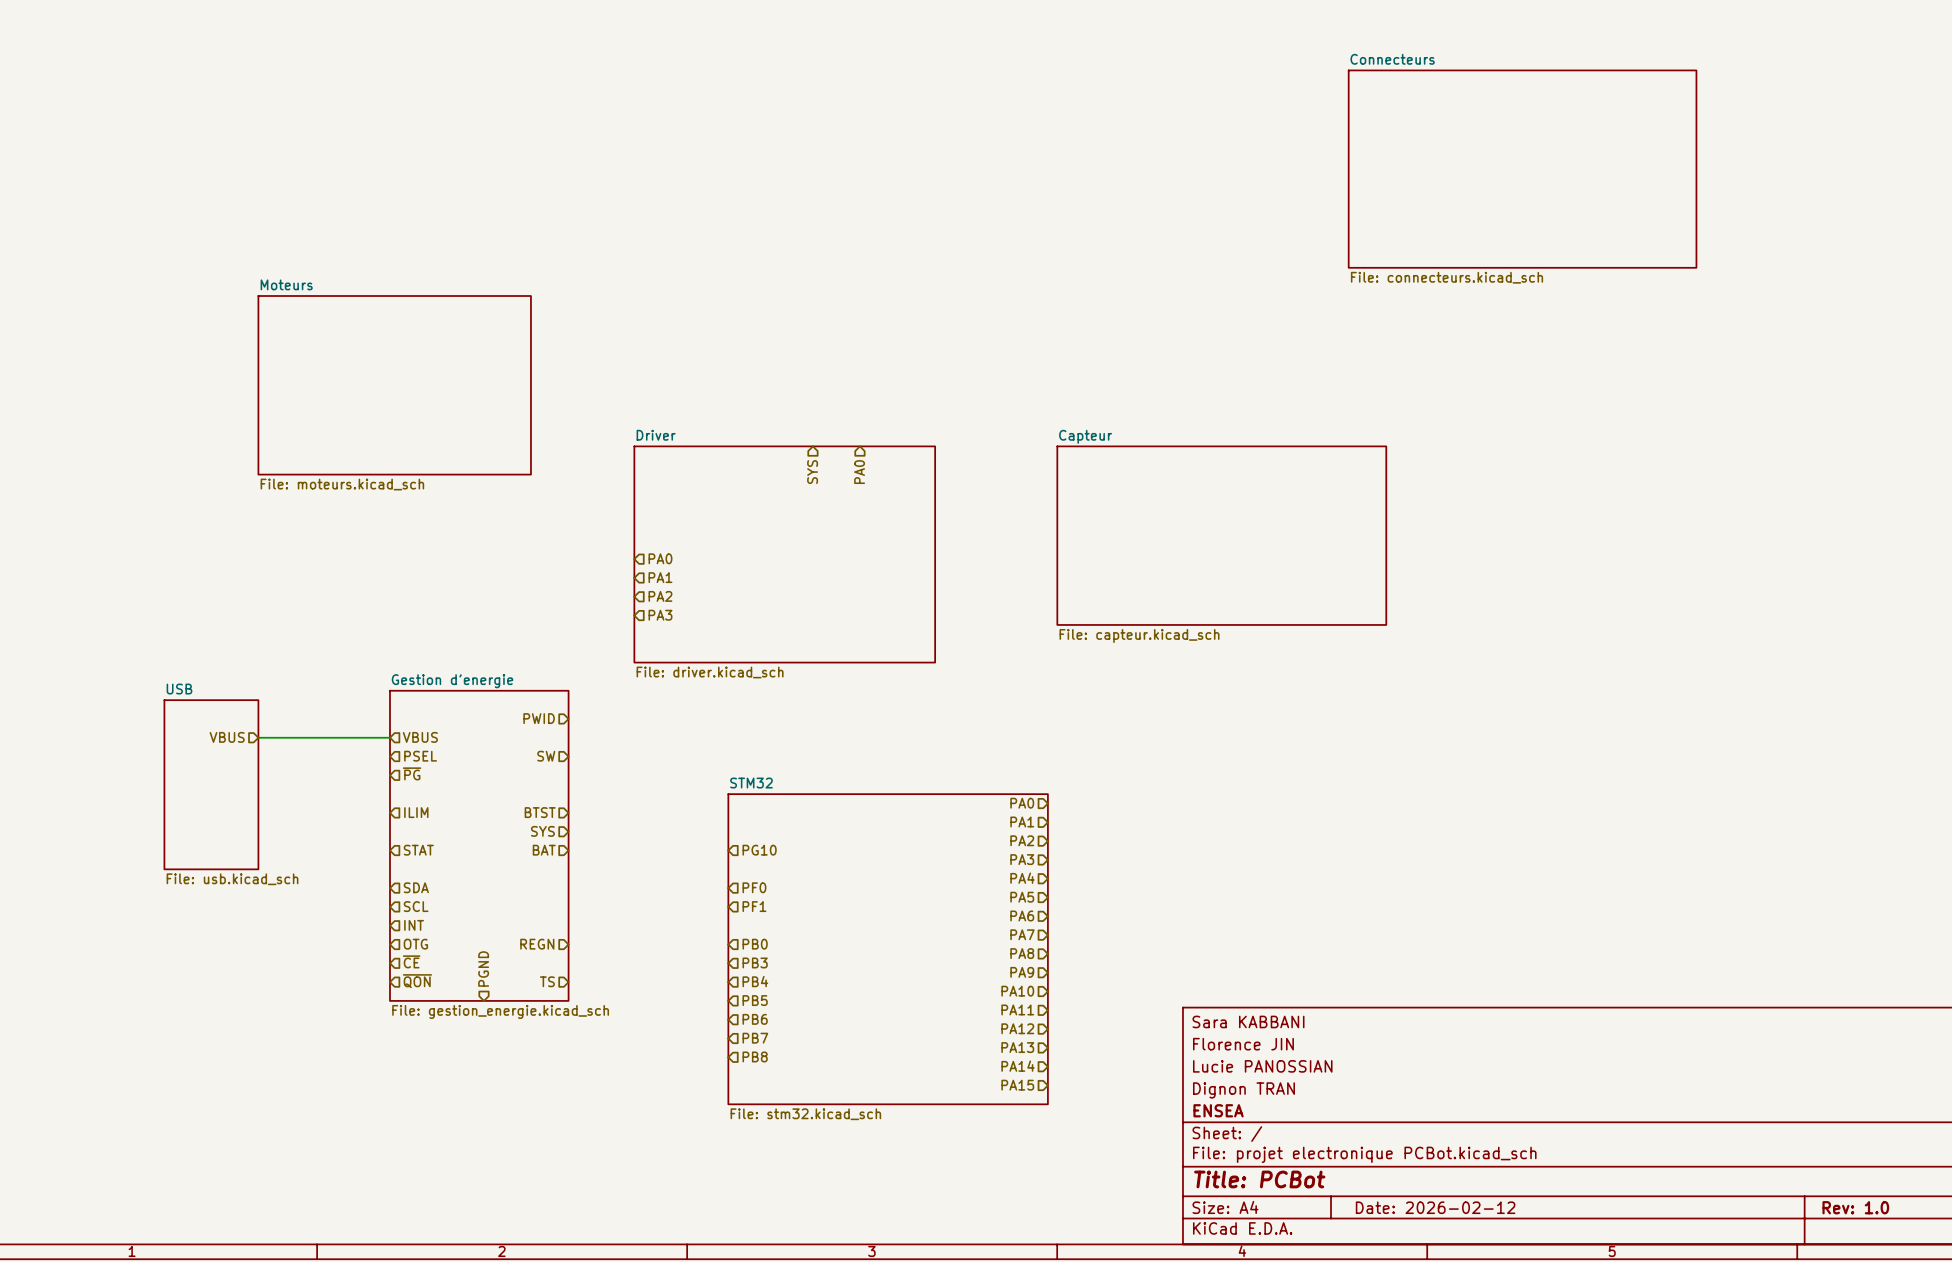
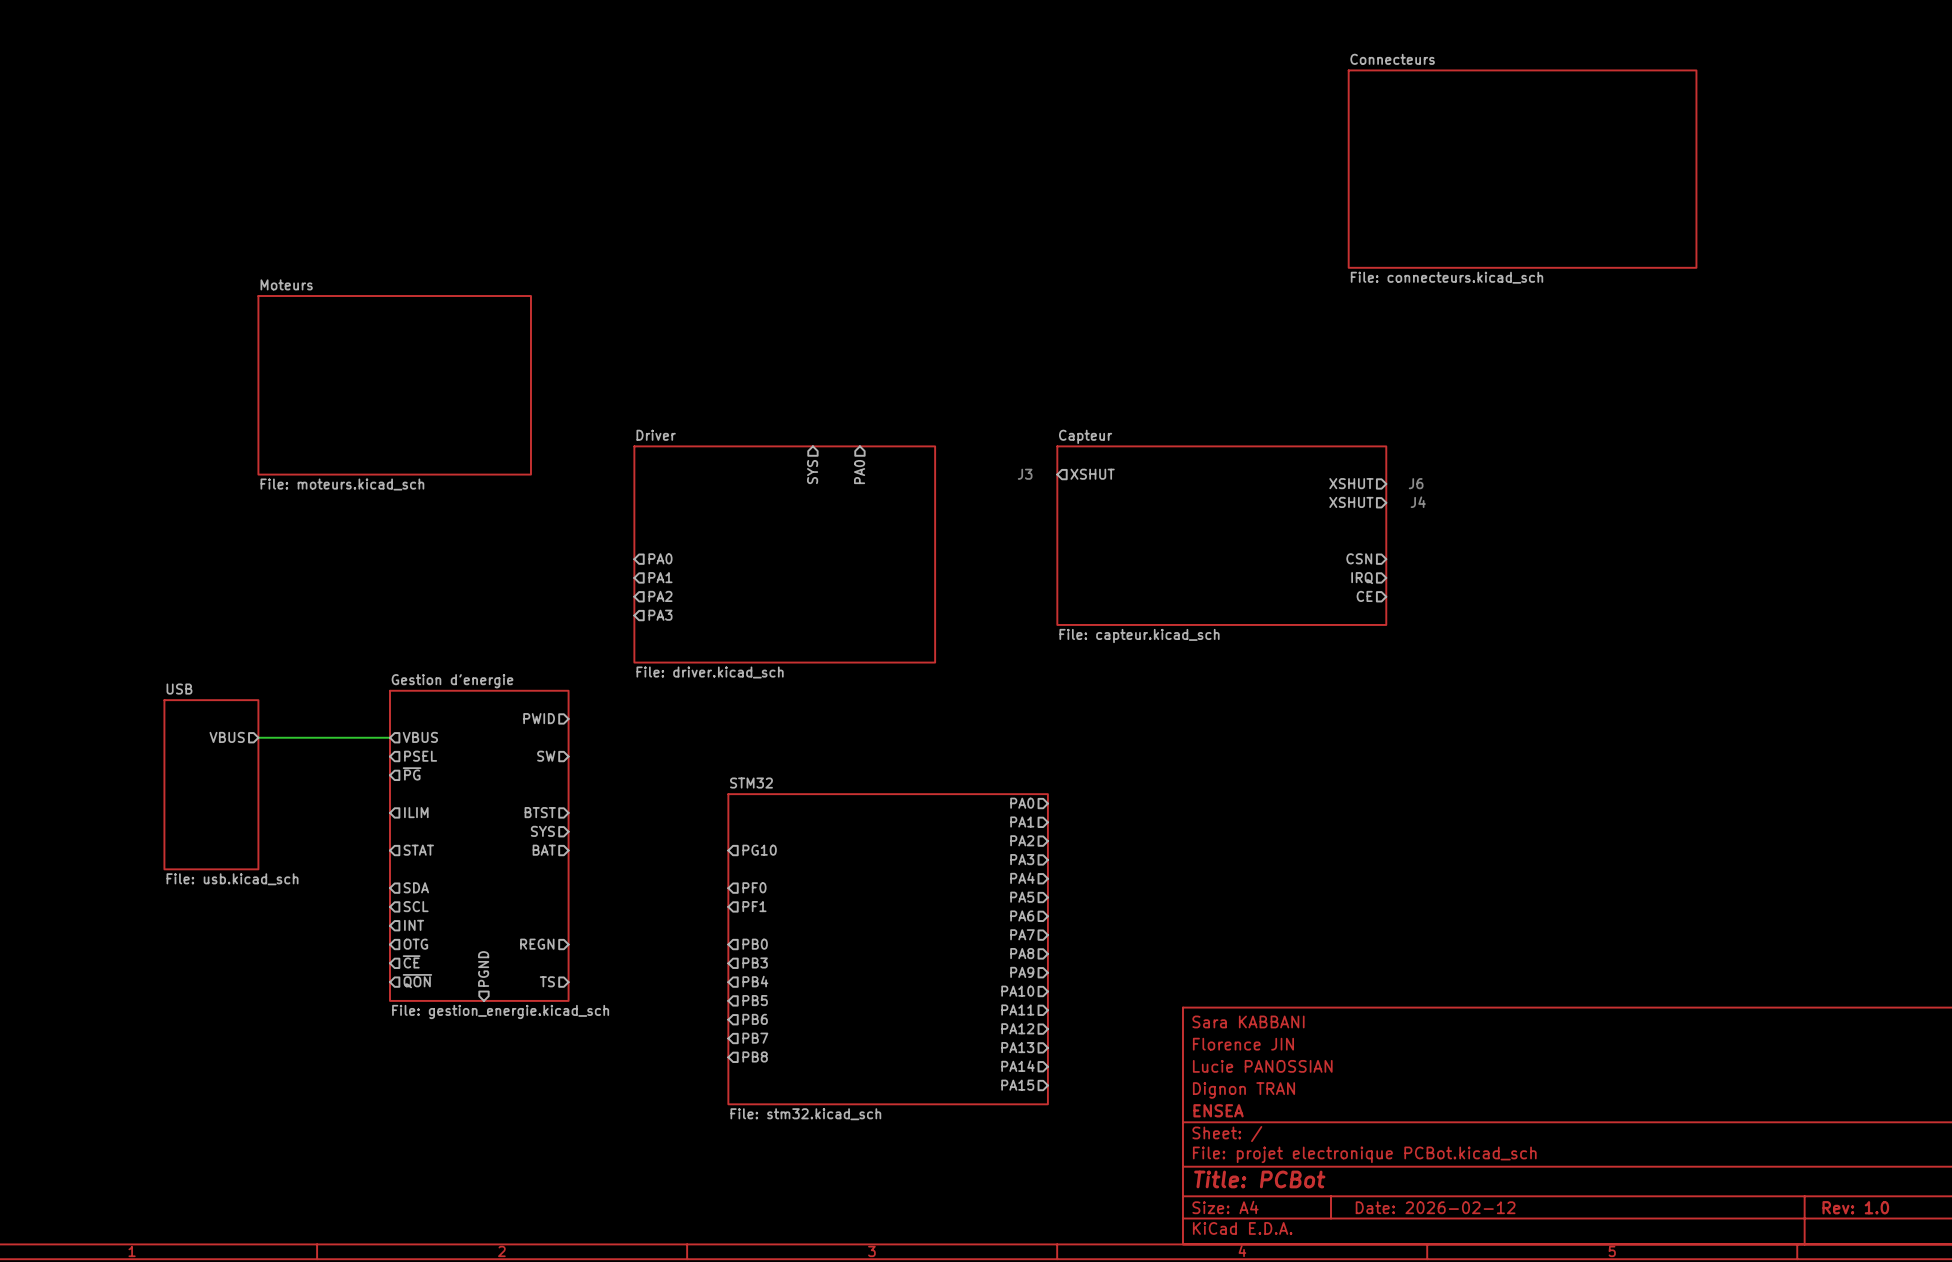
text: none -> J3 (1025, 474)
hierarchical label: none -> XSHUT (1092, 474)
hierarchical label: none -> XSHUT (1351, 483)
text: none -> J6 (1416, 483)
hierarchical label: none -> XSHUT (1351, 502)
text: none -> J4 (1418, 502)
hierarchical label: none -> CSN (1359, 558)
hierarchical label: none -> IRQ (1362, 578)
hierarchical label: none -> CE (1364, 596)

